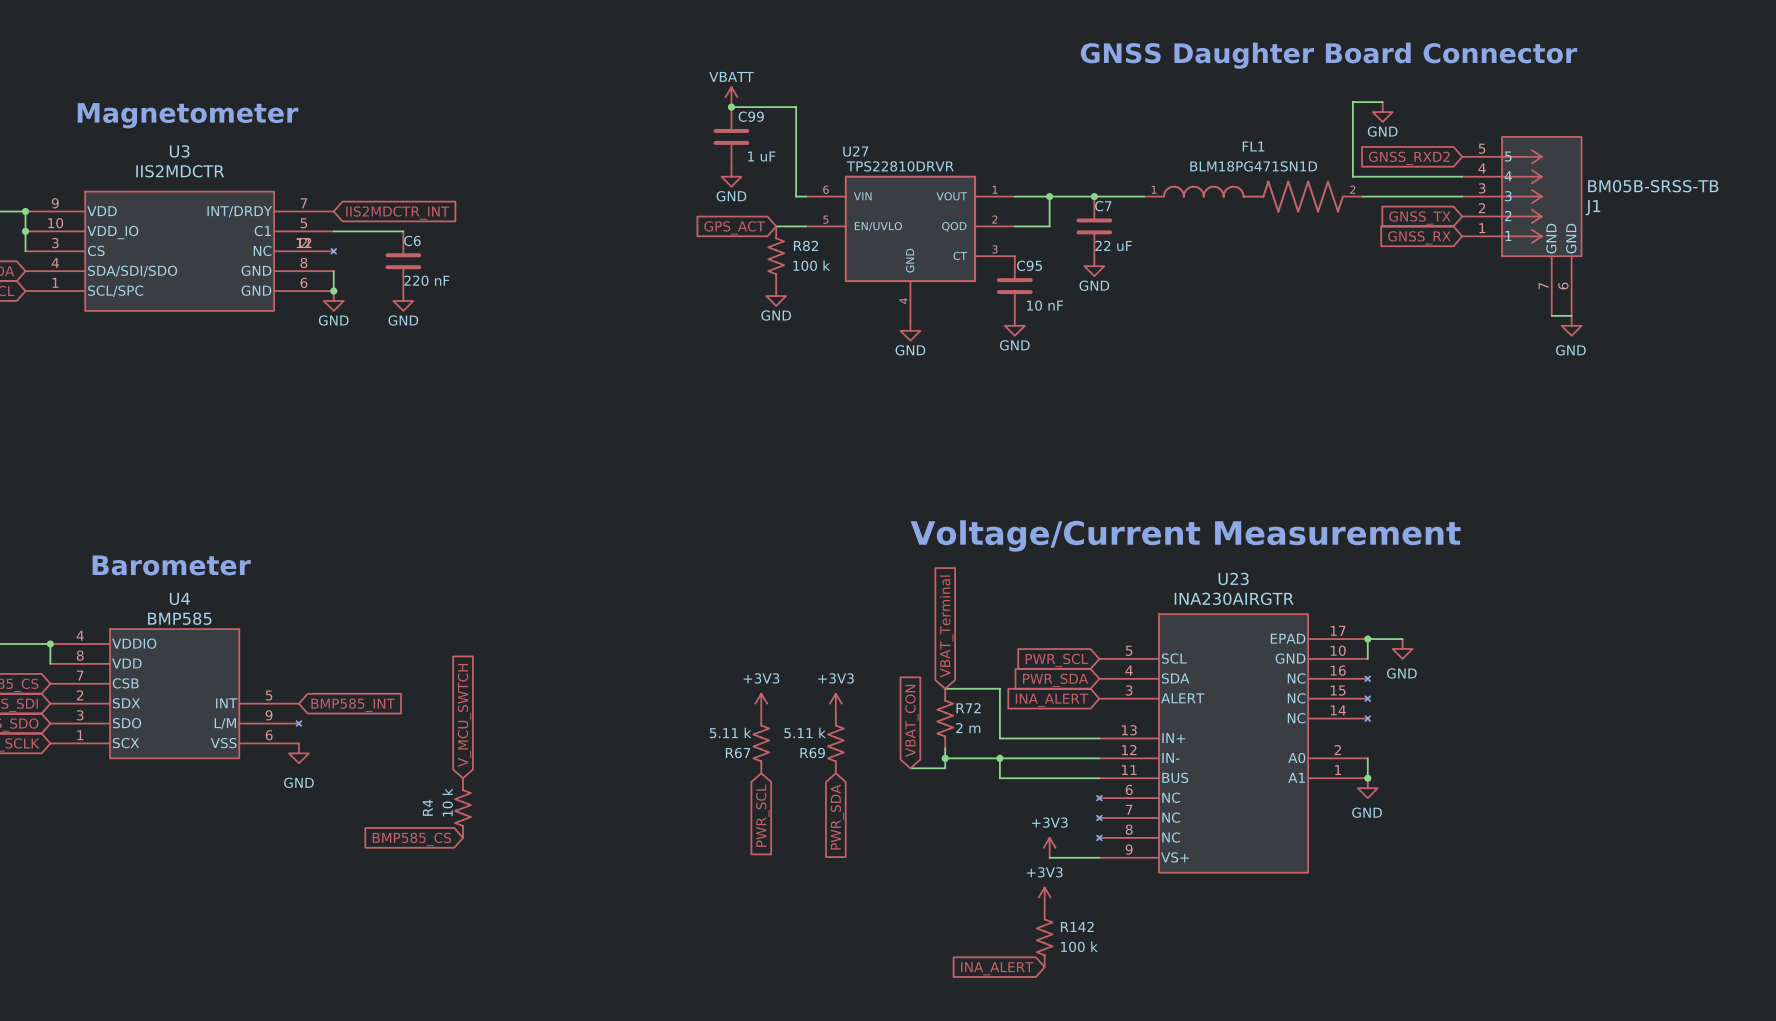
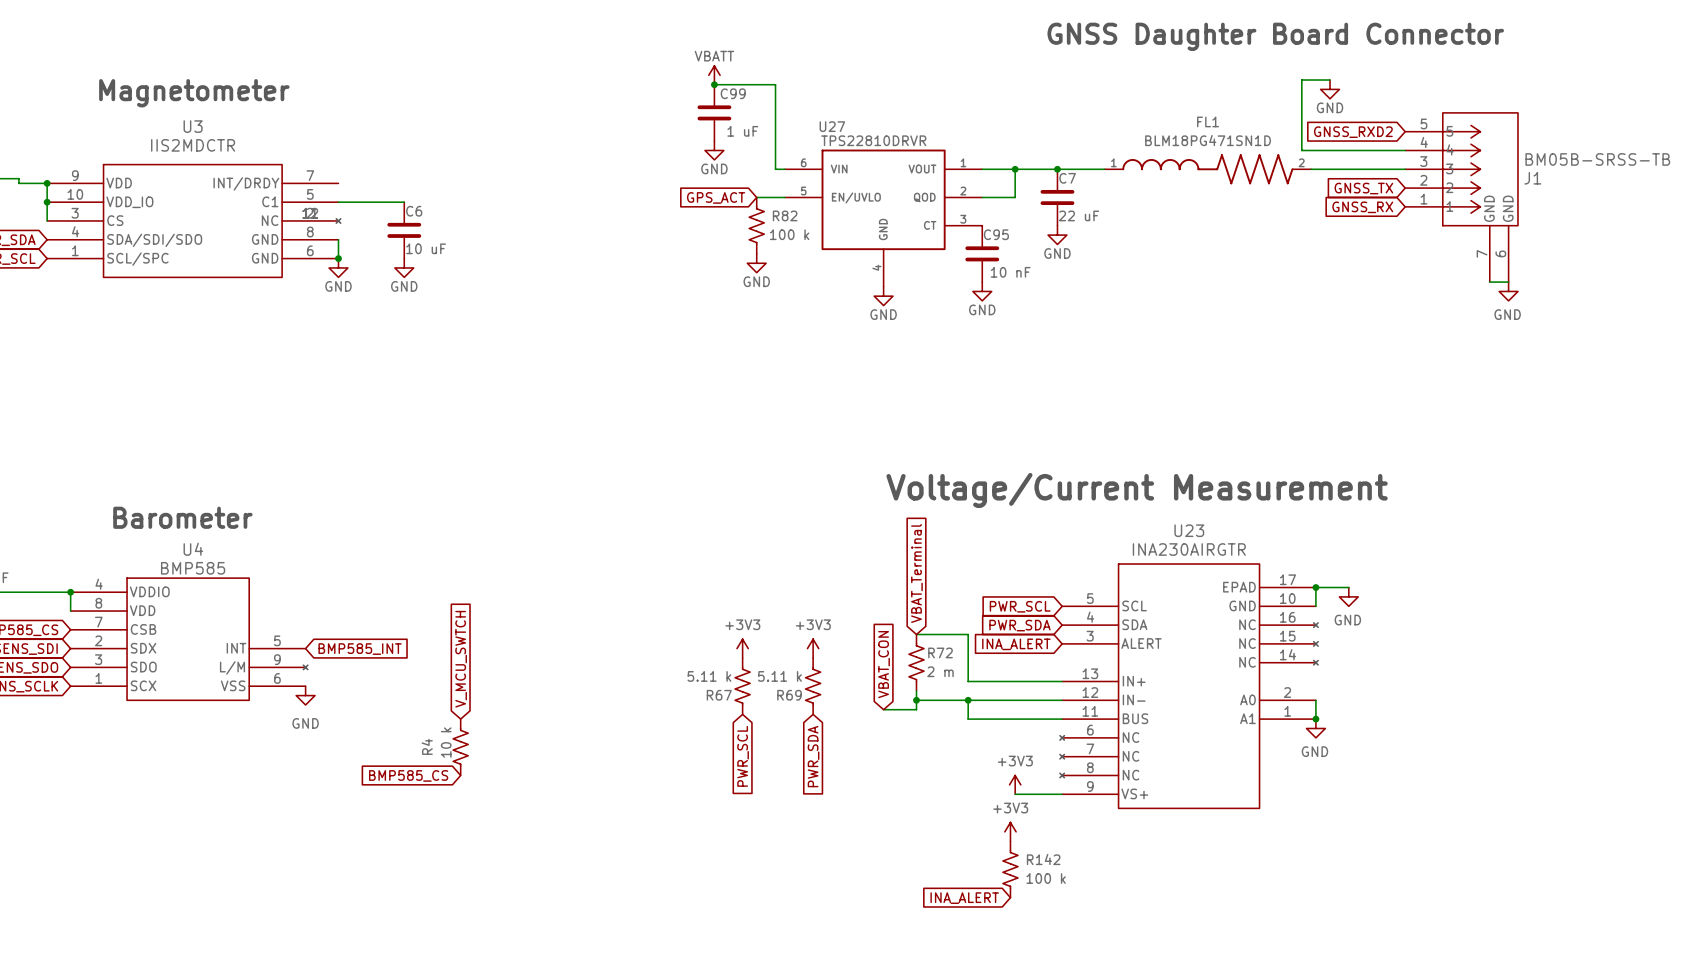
global label: IIS2MDCTR_INT (397, 213) -> none
C6 value: 220 nF (426, 280) -> 10 uF (426, 248)

